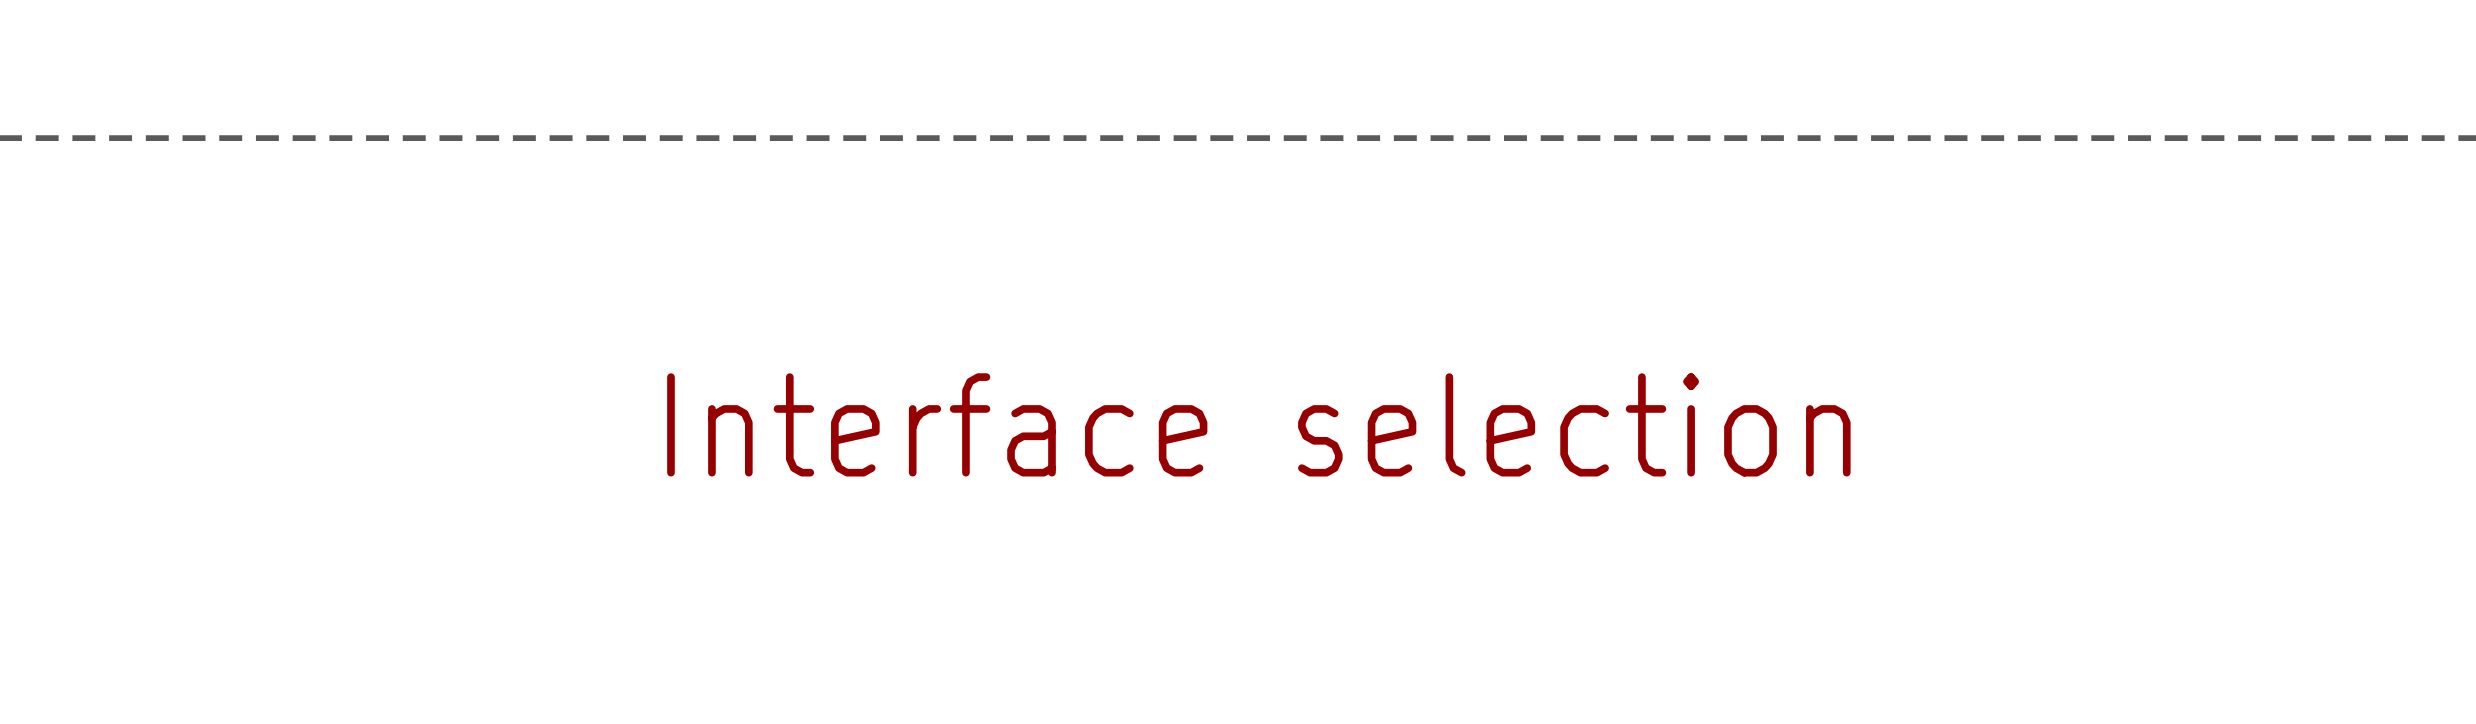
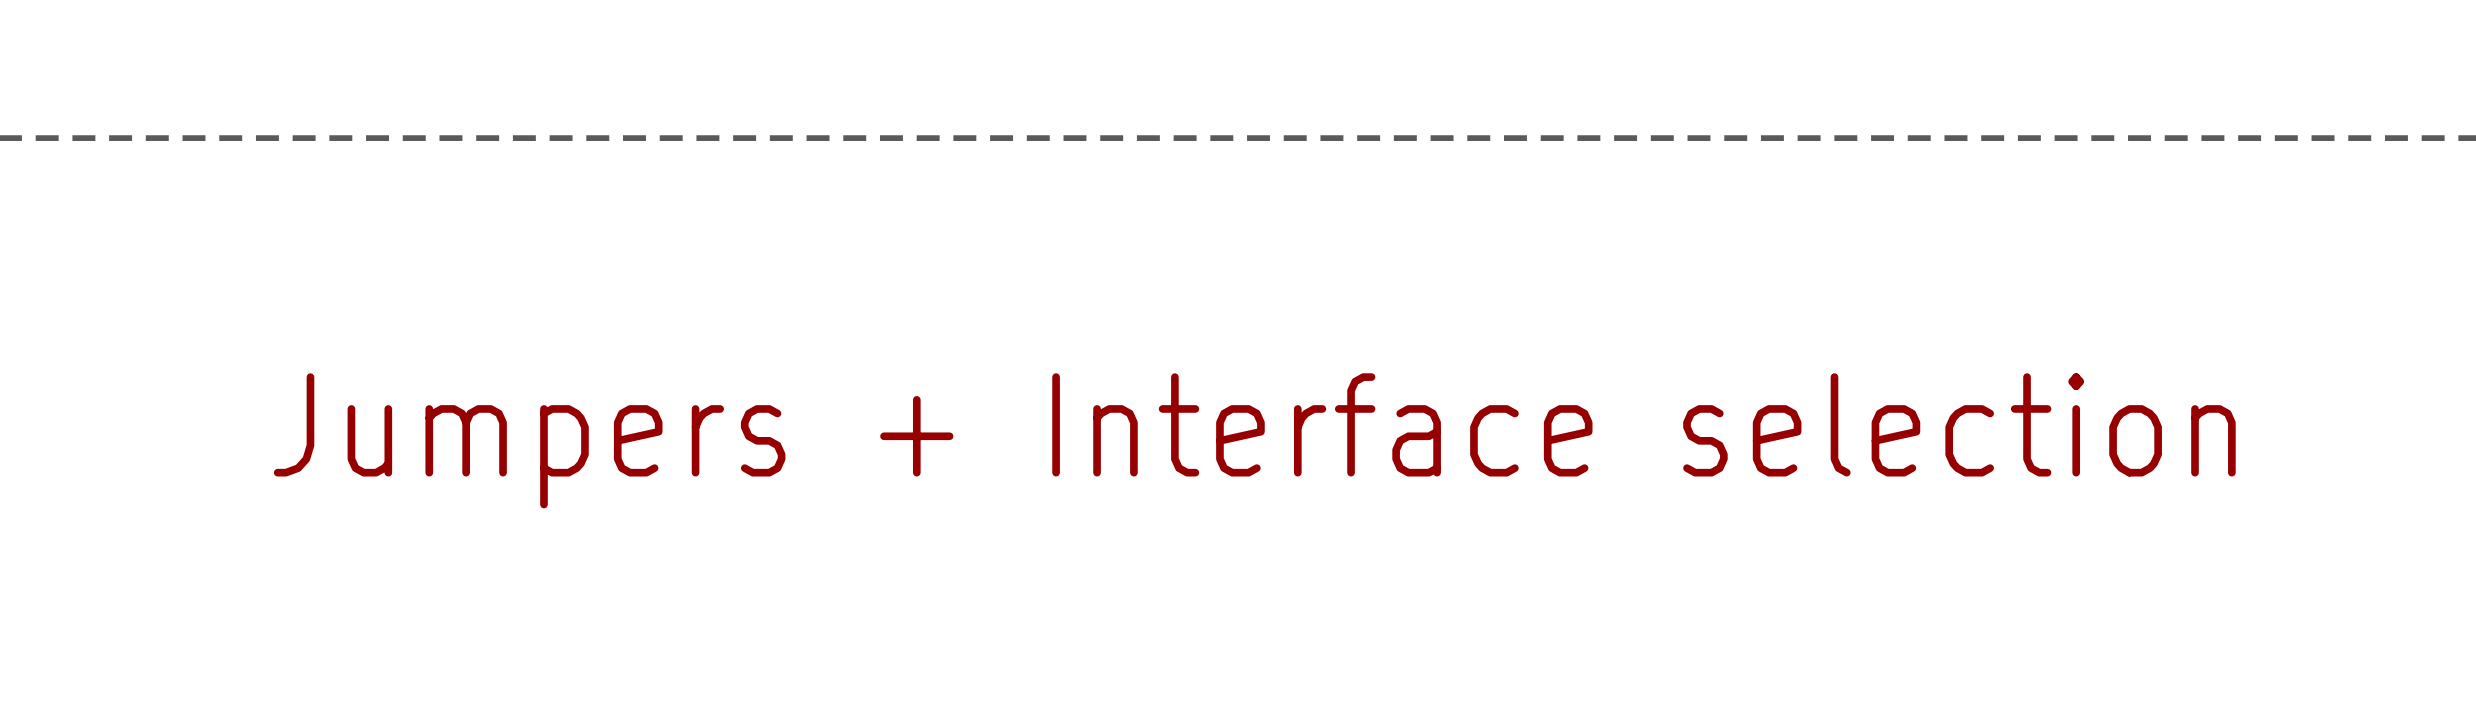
text: Interface selection (1258, 424) -> Jumpers + Interface selection (1254, 440)

